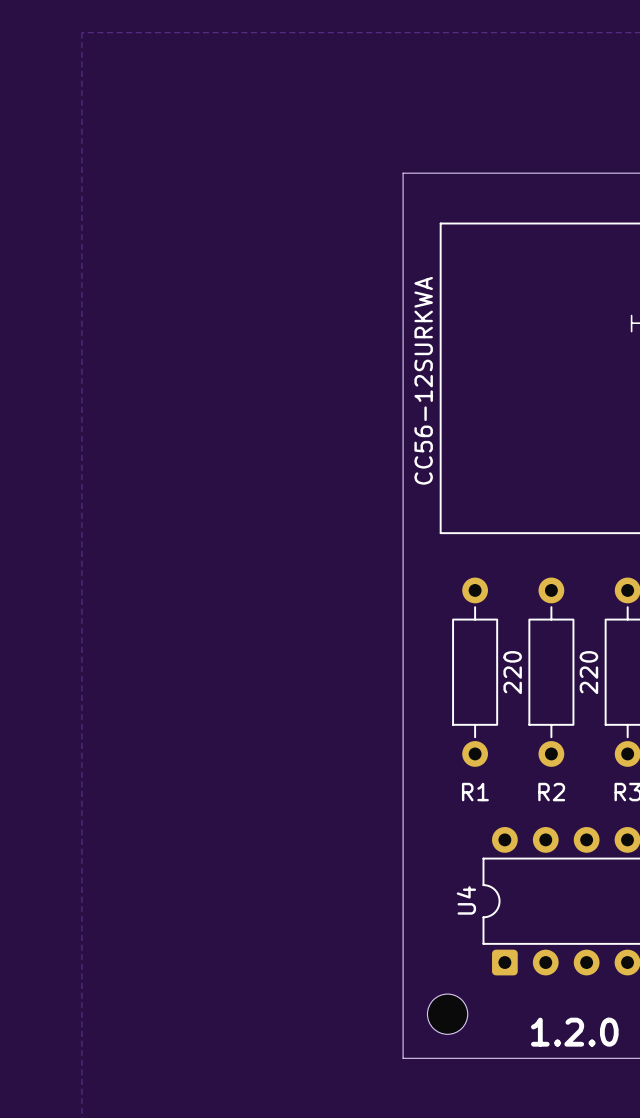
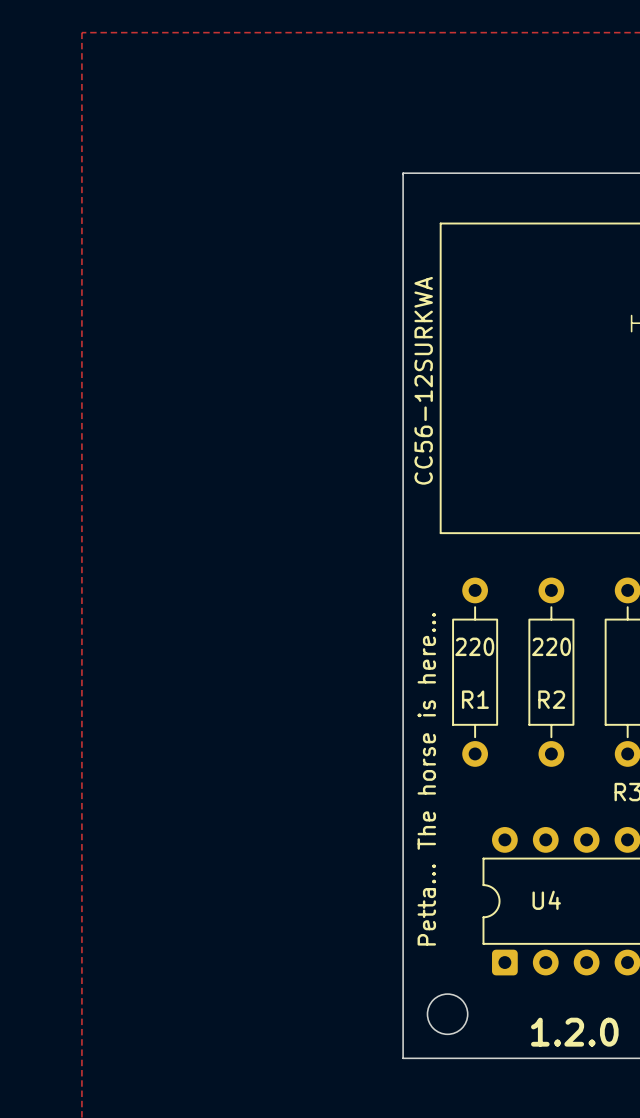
R1 value rotation: 0° (512, 672) -> 90° clockwise (474, 646)
R2 value rotation: 0° (588, 672) -> 90° clockwise (551, 646)
text: none -> Petta... The horse is here... (426, 779)
R1 name position: R1 (475, 792) -> R1 (475, 699)
R2 name position: R2 (551, 792) -> R2 (551, 699)
U4 name rotation: 0° (466, 900) -> 90° clockwise (546, 900)
U4 name position: U4 (466, 900) -> U4 (546, 900)

